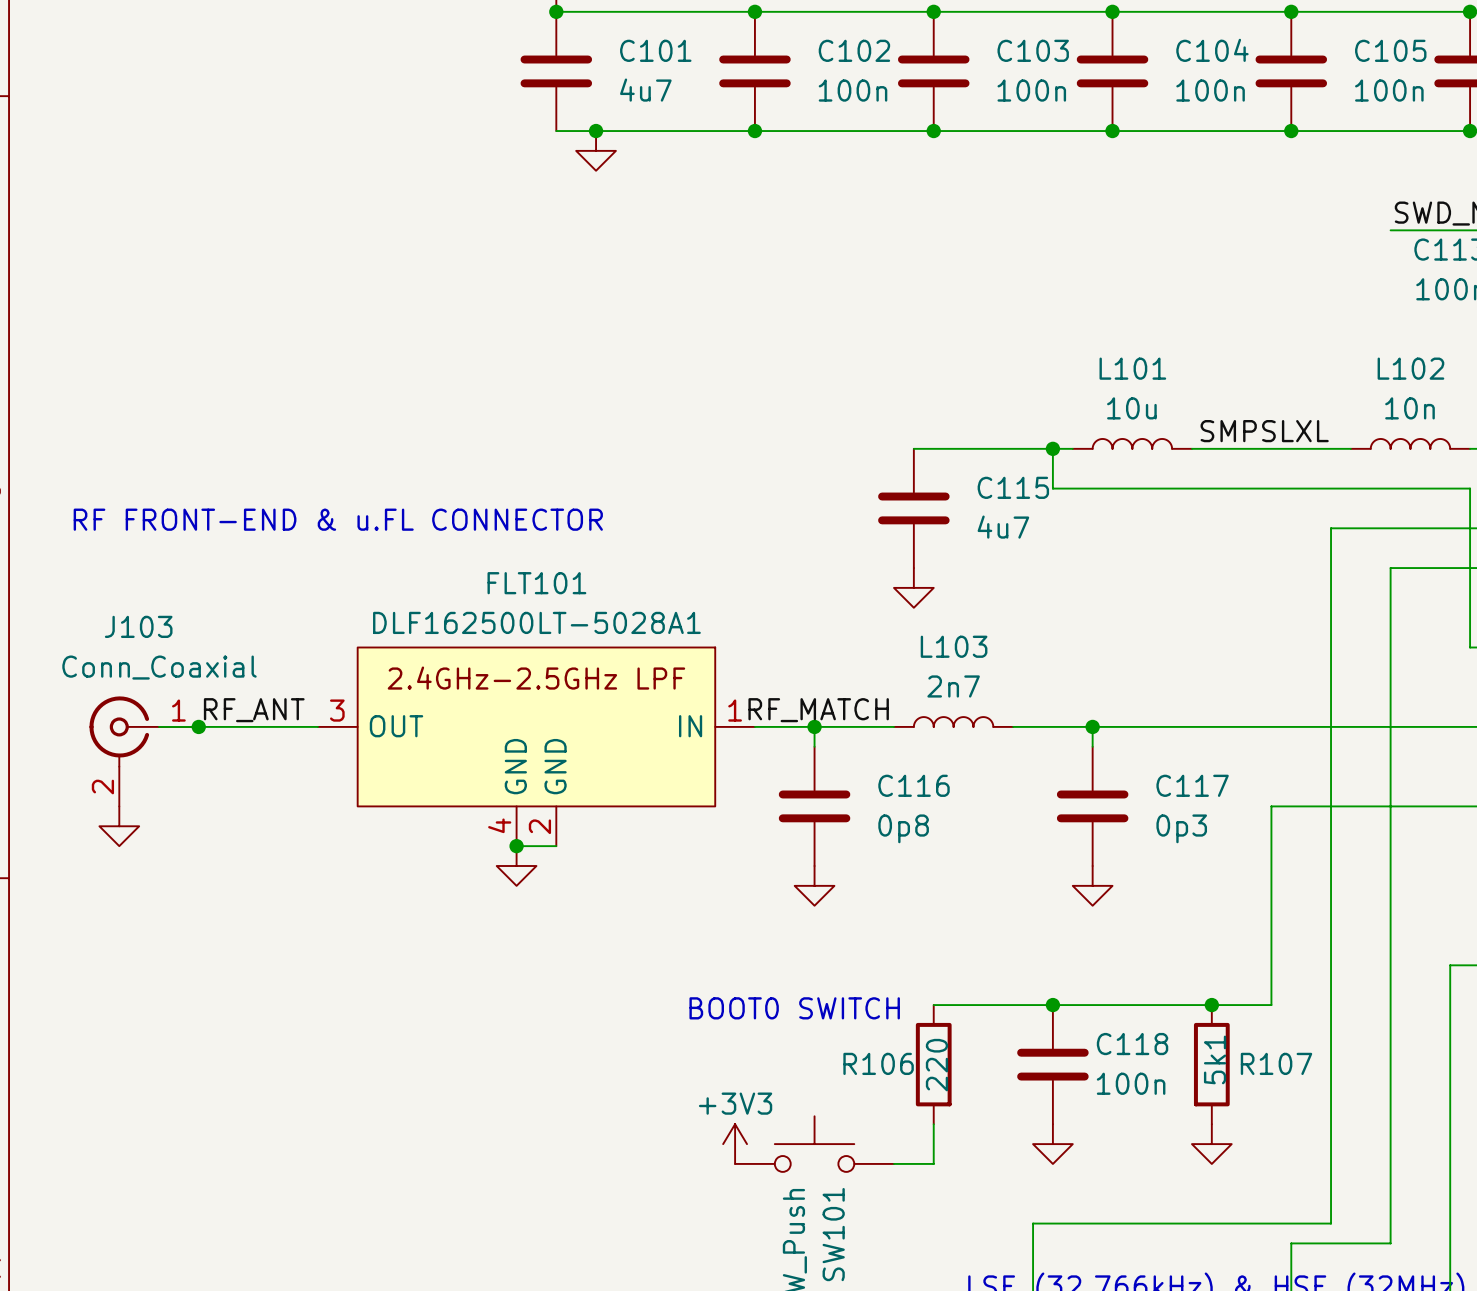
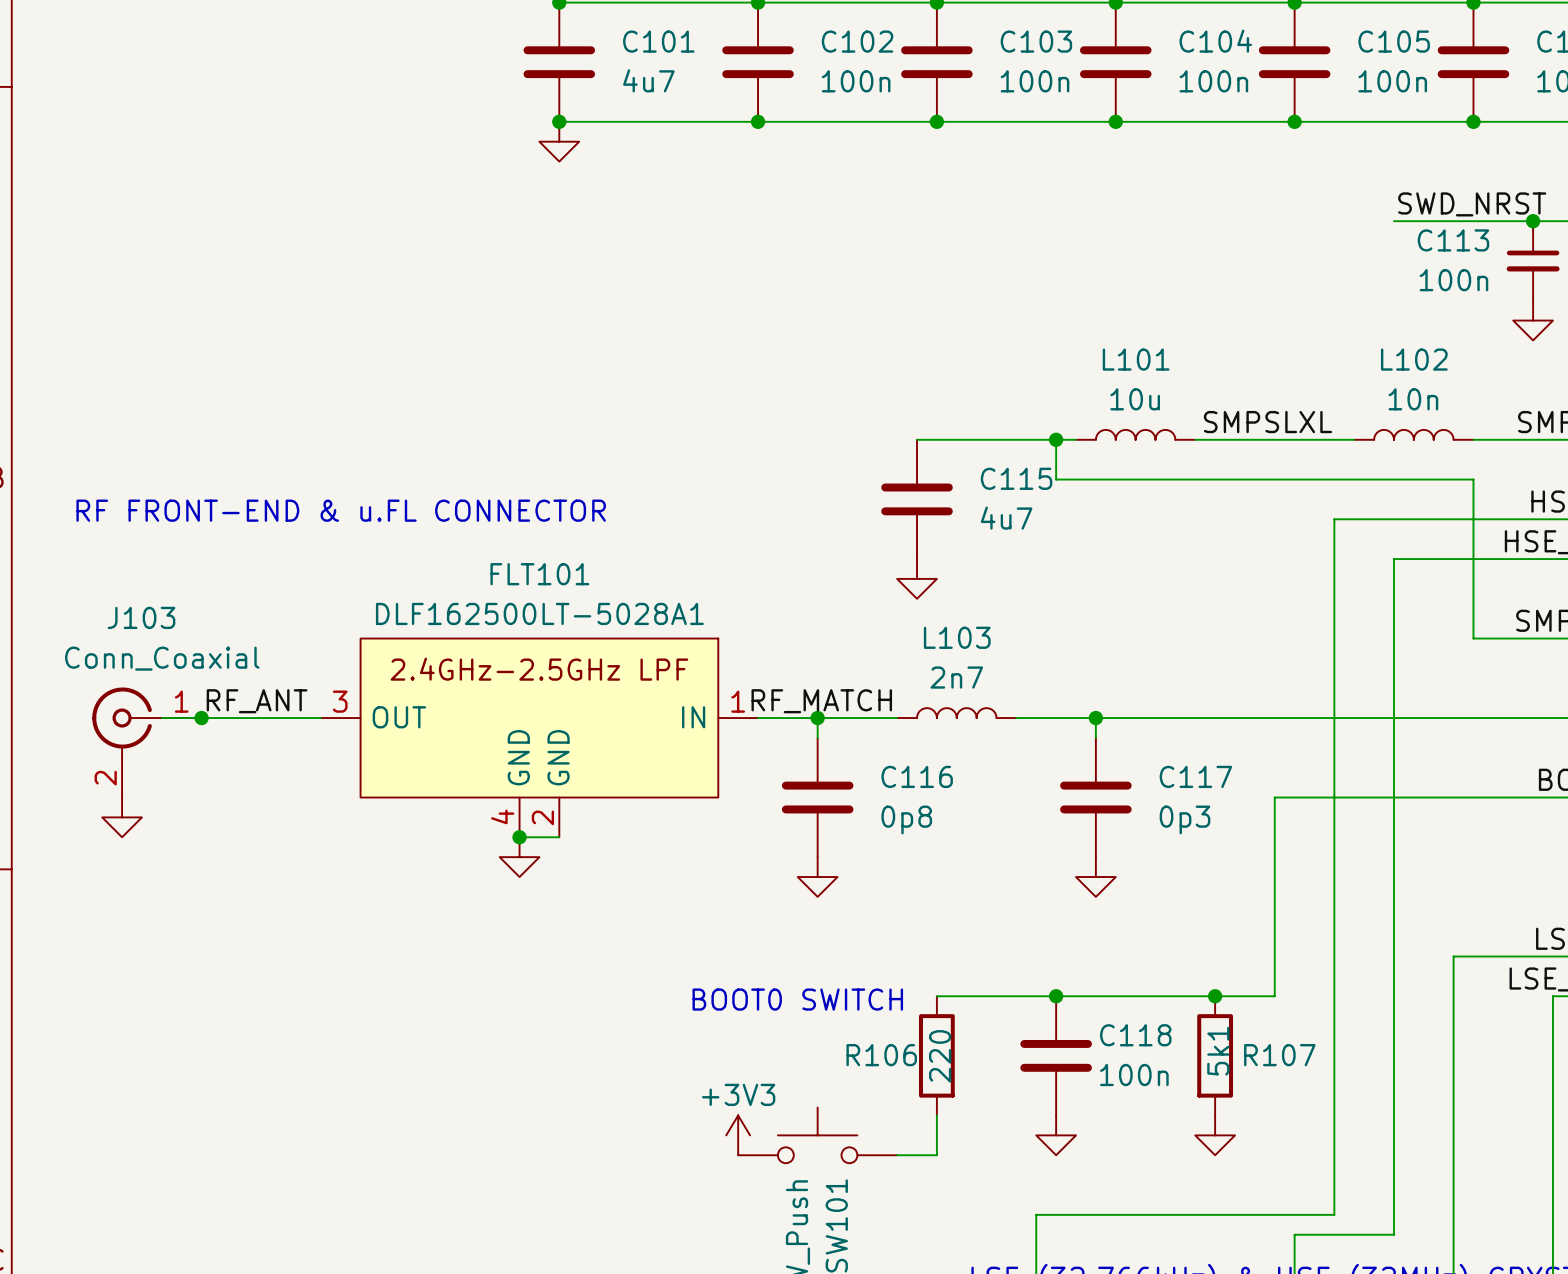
junction position: (596, 131) -> (559, 121)
power symbol position: (596, 150) -> (559, 141)

